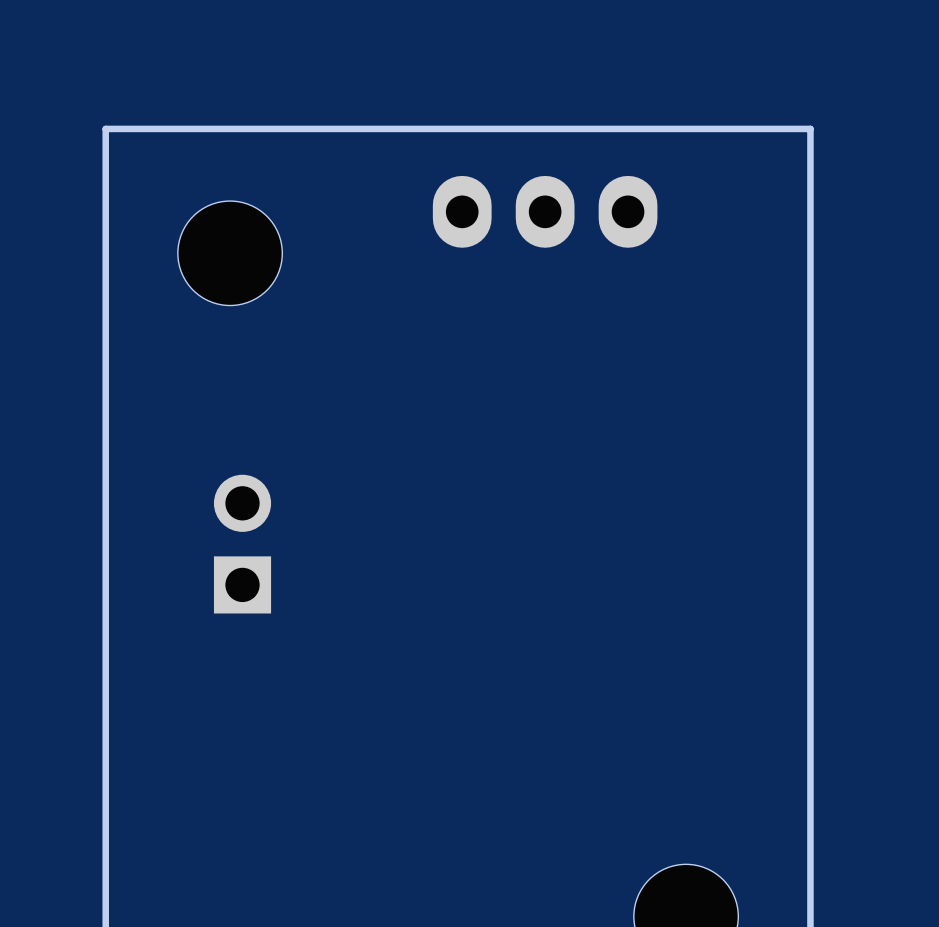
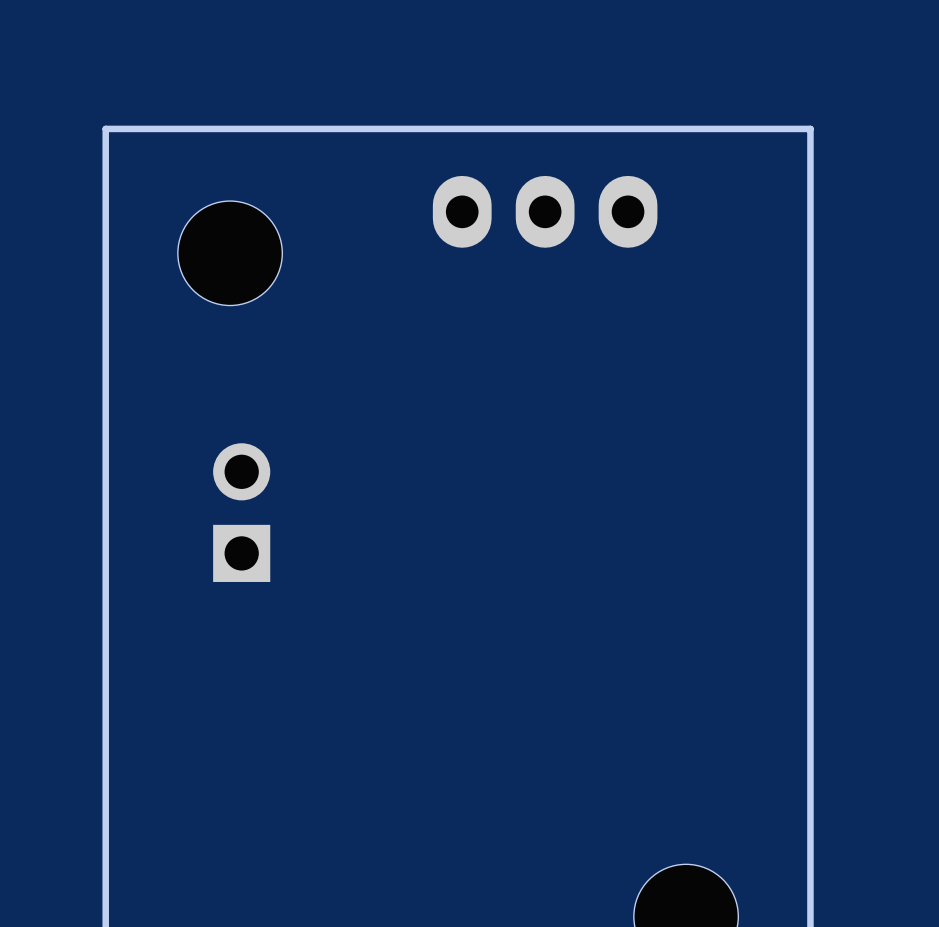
part position: (242, 544) -> (241, 512)

